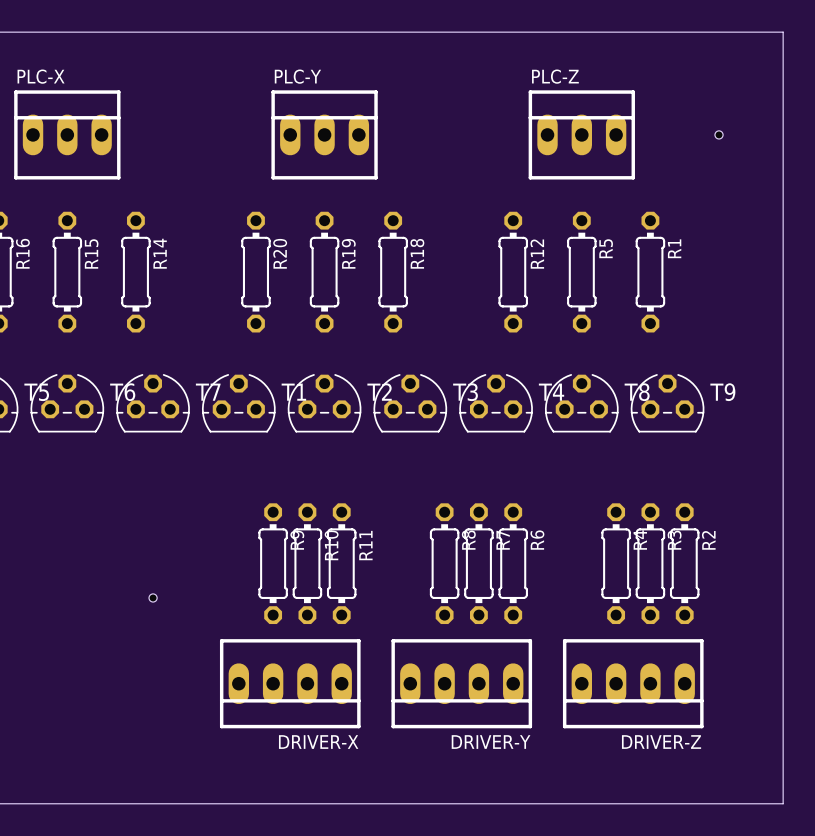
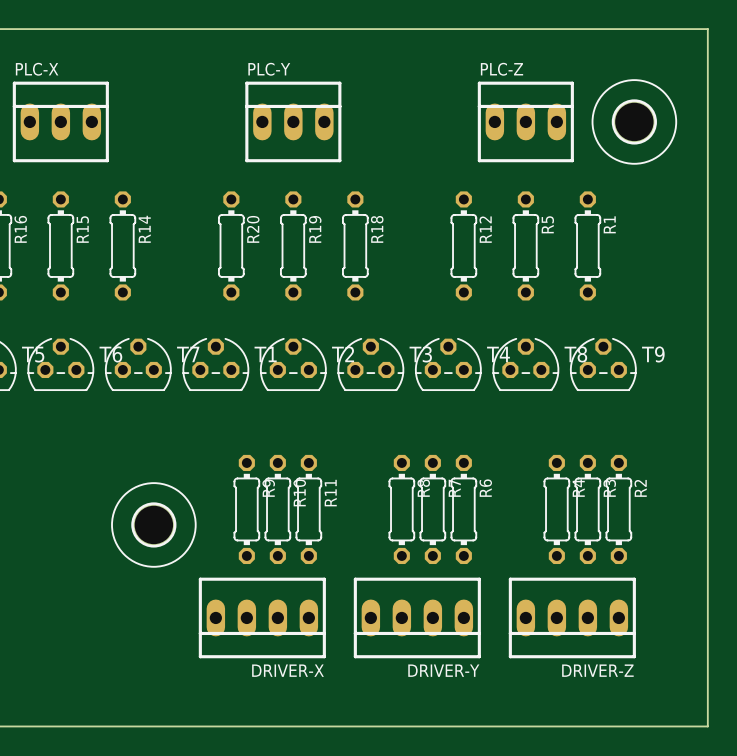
part: none -> (634, 121)
hole: (719, 134) -> none
part: none -> (153, 524)
hole: (153, 597) -> none

